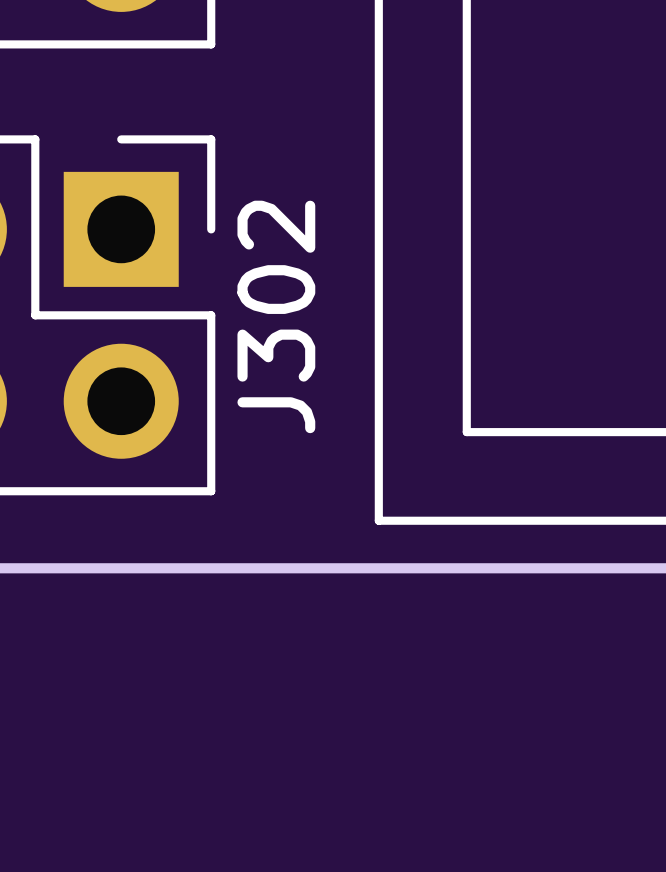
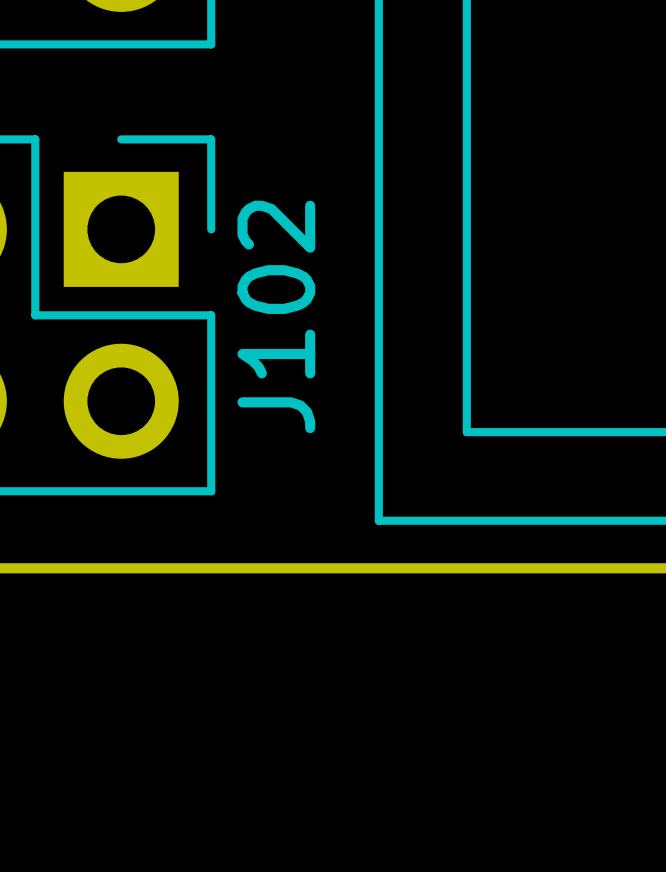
J302 name: J302 (276, 316) -> J102 (276, 316)

